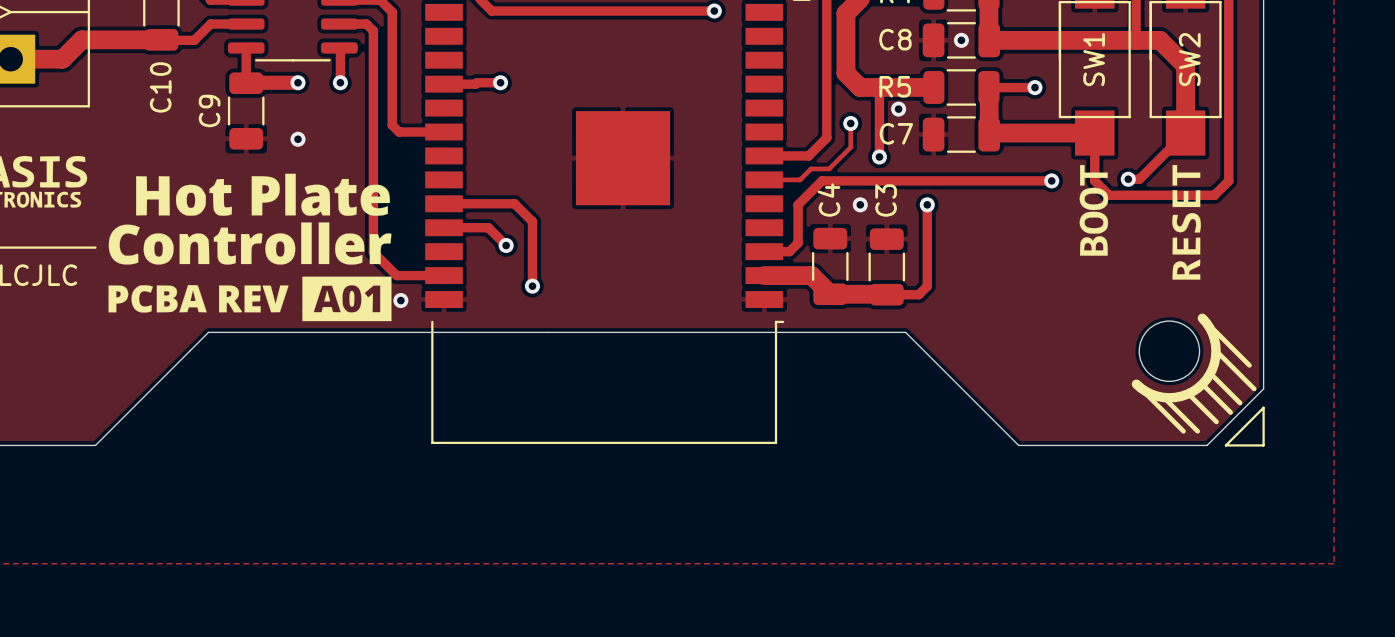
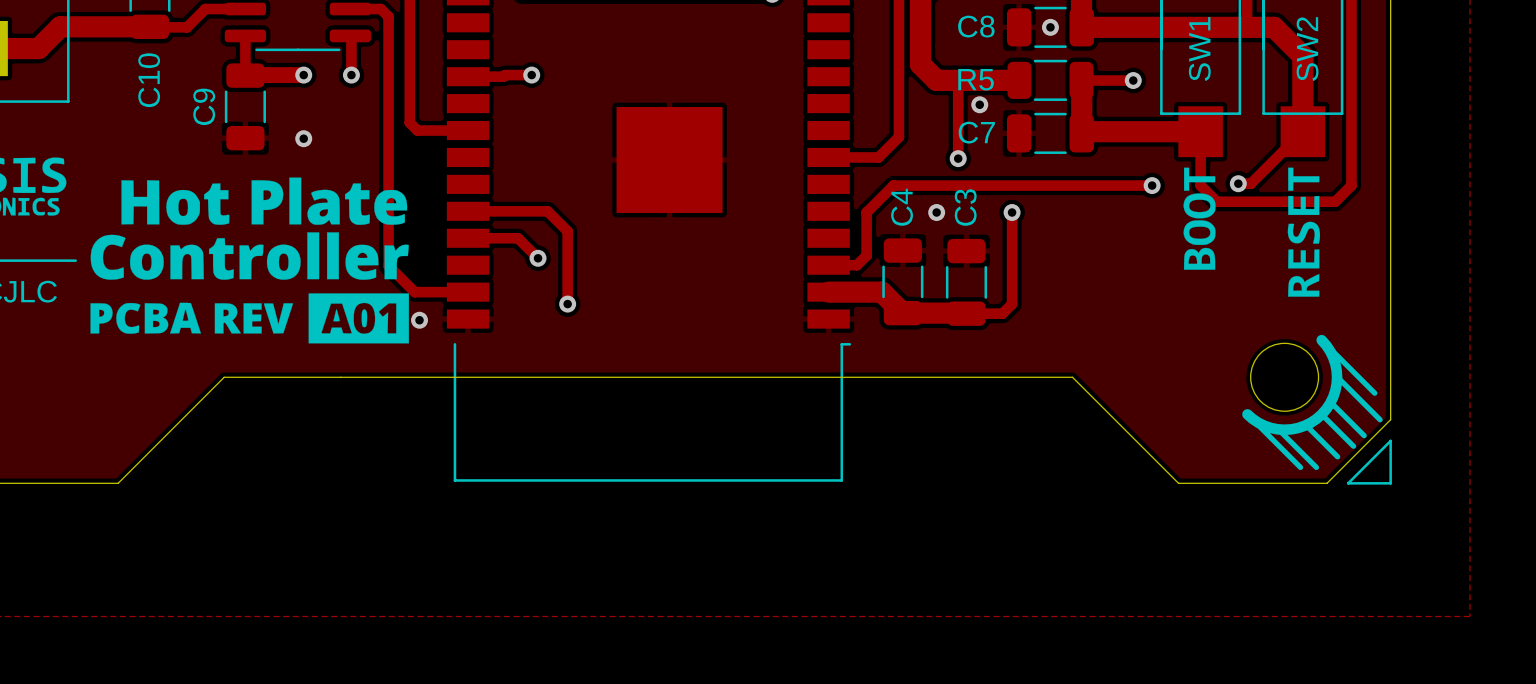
track: (850, 123) (850, 147) (829, 168) (811, 168) (800, 179) (764, 179) -> none
via: (850, 123) -> none
board edge: (95, 445) (208, 332) (905, 332) (1018, 445) (1075, 445) -> (75, 483) (118, 483) (224, 377) (1072, 377) (1178, 483)

